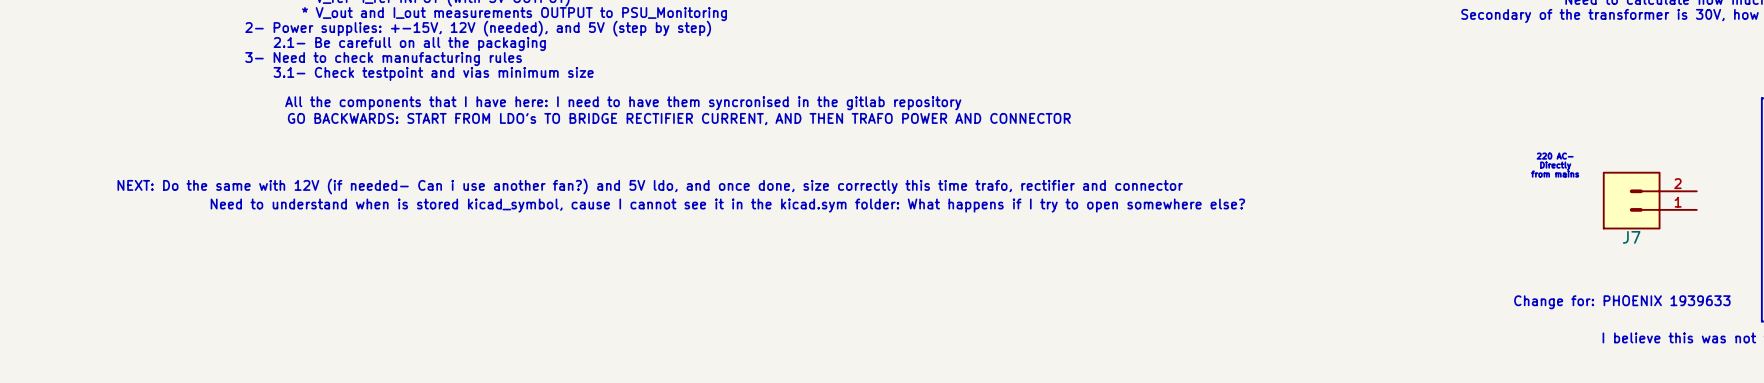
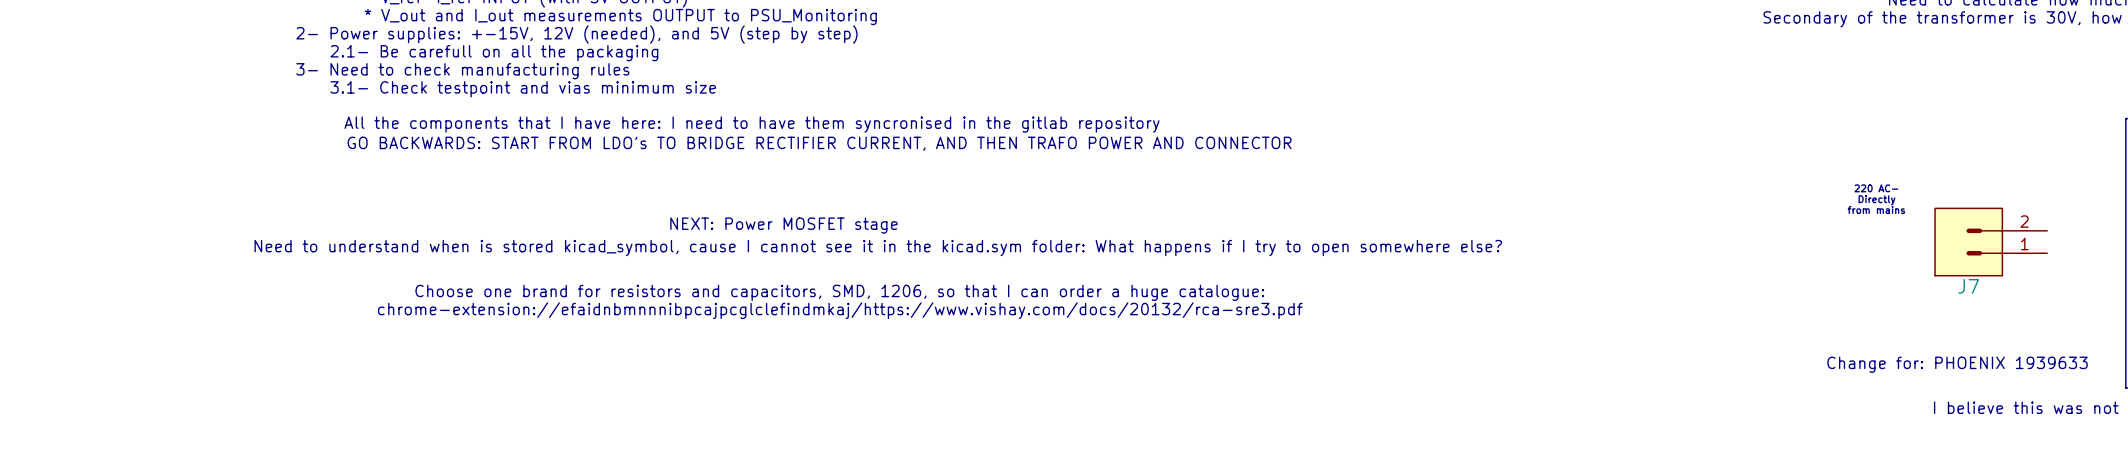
text: NEXT: Do the same with 12V (if needed- Can i use another fan?) and 5V ldo, and once done, size correctly this time trafo, rectifier and connector (650, 186) -> NEXT: Power MOSFET stage (783, 225)
text: none -> Choose one brand for resistors and capacitors, SMD, 1206, so that I can order a huge catalogue: (839, 292)
text: none -> chrome-extension://efaidnbmnnnibpcajpcglclefindmkaj/https://www.vishay.com/docs/20132/rca-sre3.pdf (840, 310)

